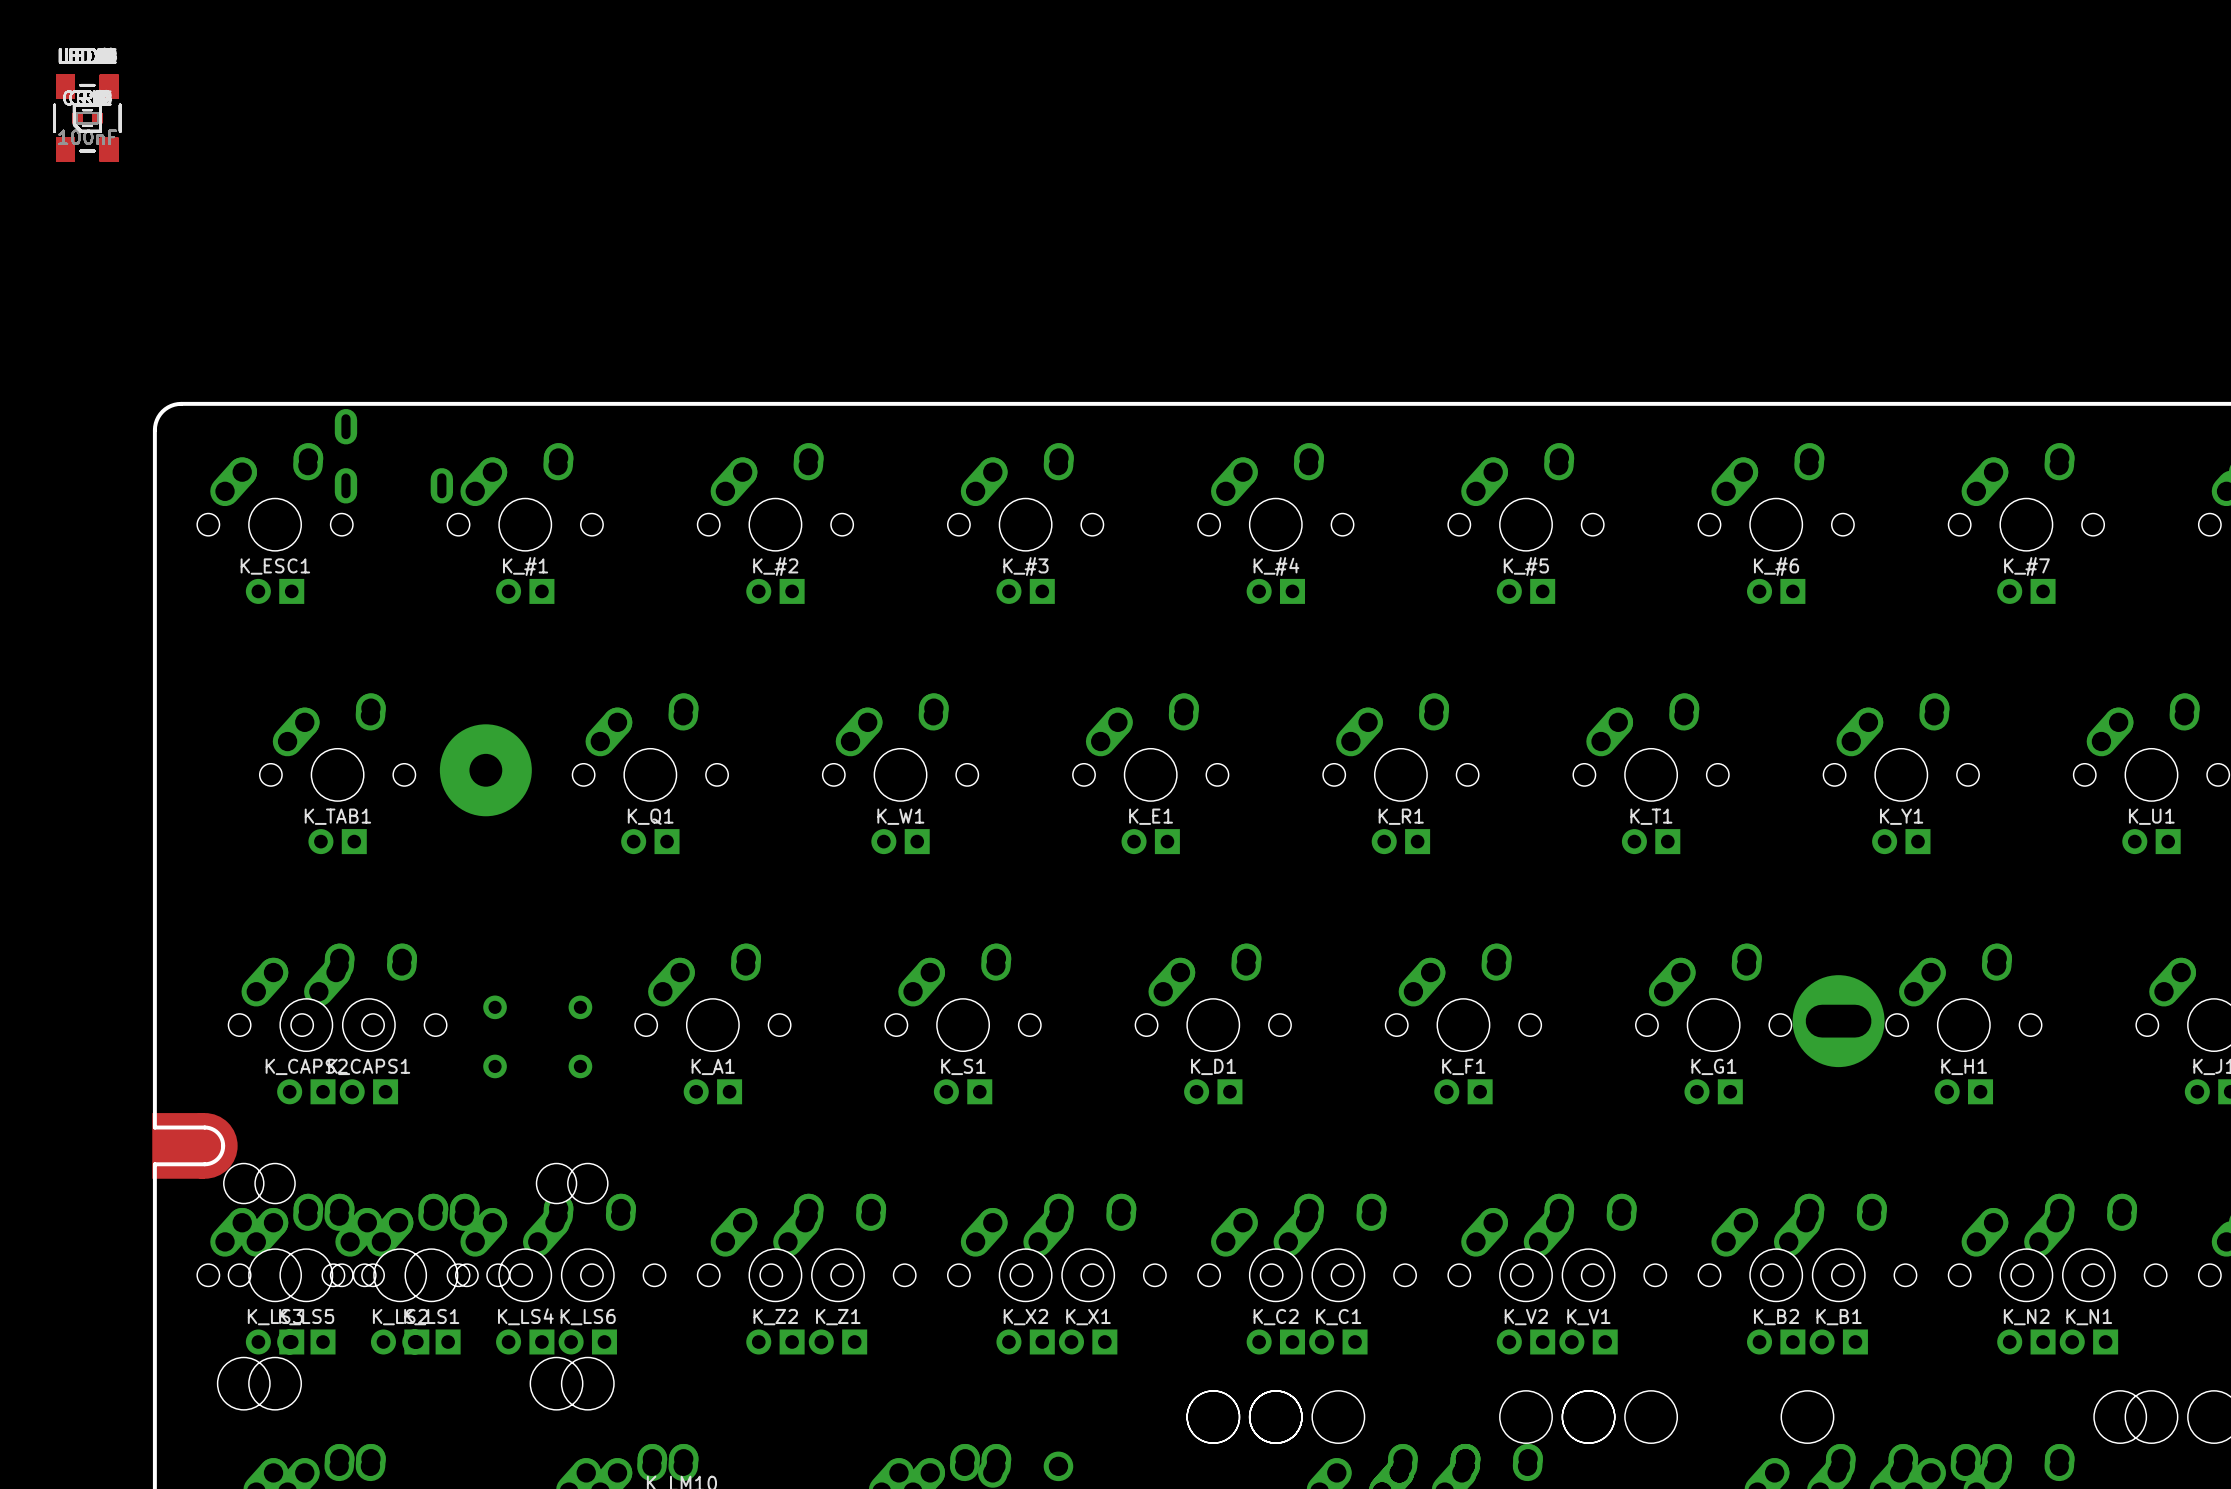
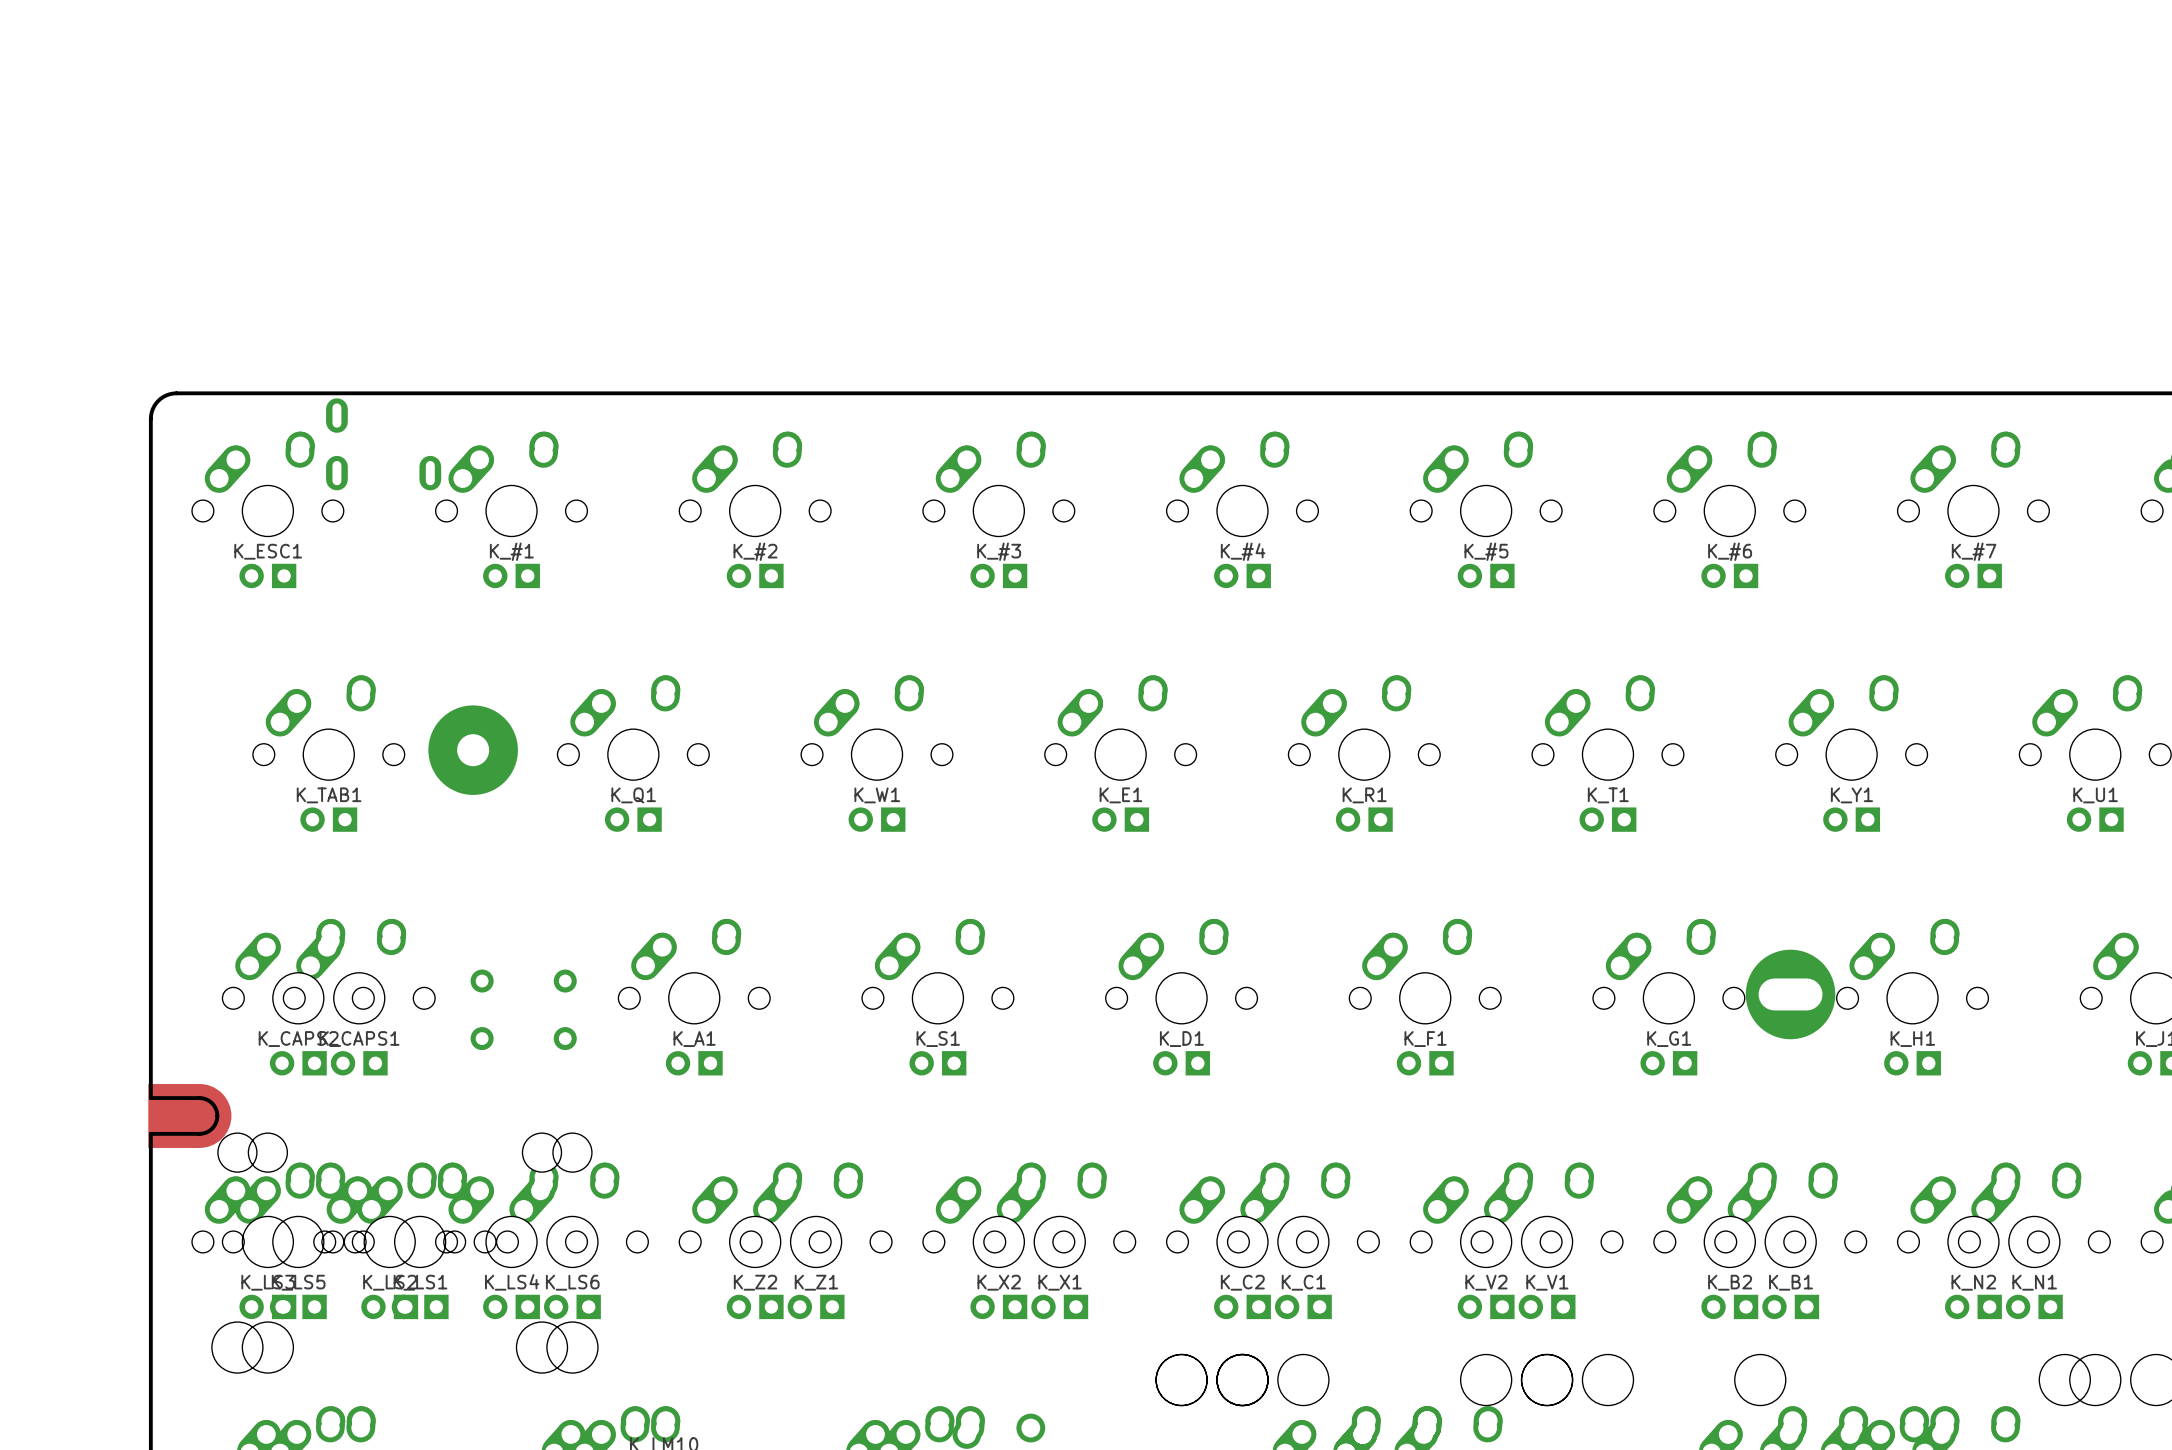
part: 100nF (87, 118) -> none
part: 100nF (87, 118) -> none
part: 100nF (87, 118) -> none
part: 100nF (87, 118) -> none
part: 100nF (87, 118) -> none
part: 100nF (87, 118) -> none
part: 100nF (87, 118) -> none
part: 100nF (87, 118) -> none
part: 100nF (87, 118) -> none
part: 100nF (87, 118) -> none
part: 100nF (87, 118) -> none
part: 100nF (87, 118) -> none
part: 100nF (87, 118) -> none
part: 100nF (87, 118) -> none
part: (87, 118) -> none
part: (87, 118) -> none
part: (87, 118) -> none
part: (87, 118) -> none
part: (87, 118) -> none
part: (87, 118) -> none
part: (87, 118) -> none
part: (87, 118) -> none
part: (87, 118) -> none
part: (87, 118) -> none
part: (87, 118) -> none
part: (87, 118) -> none
part: (87, 118) -> none
part: (87, 118) -> none

